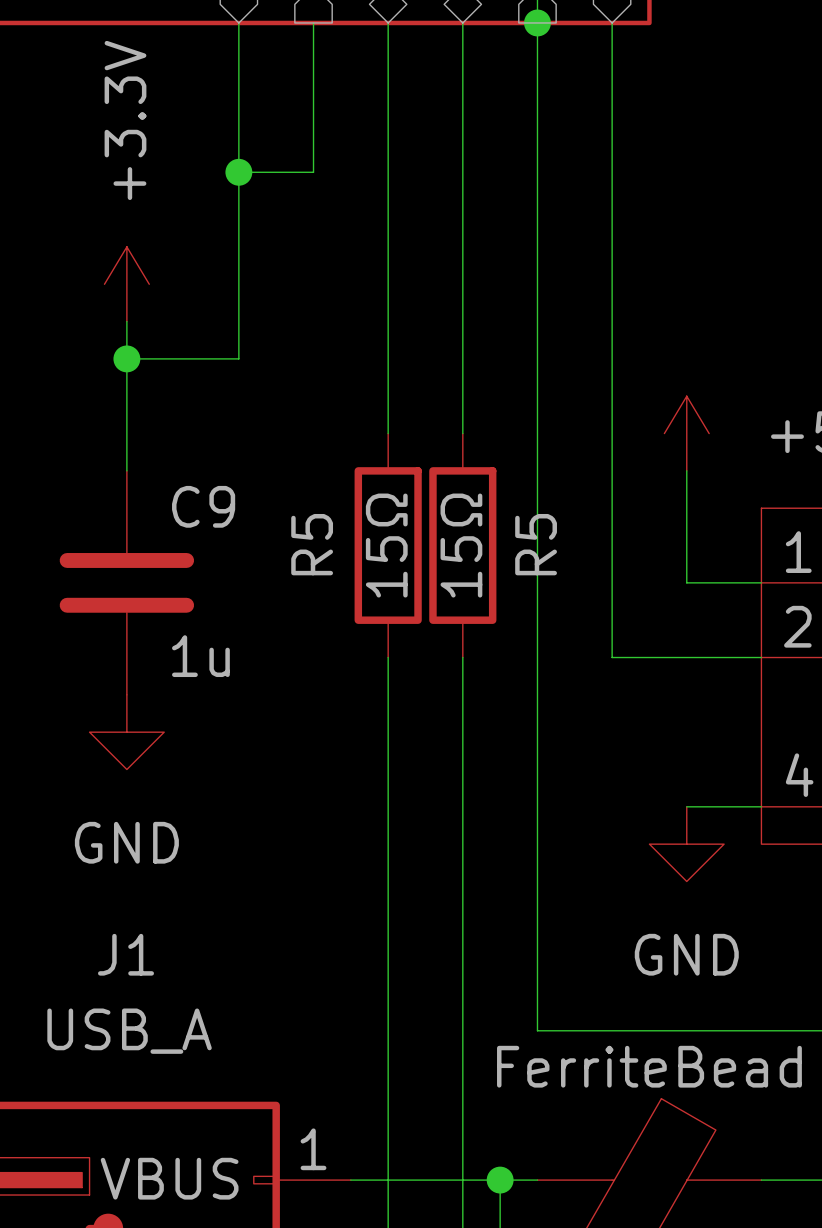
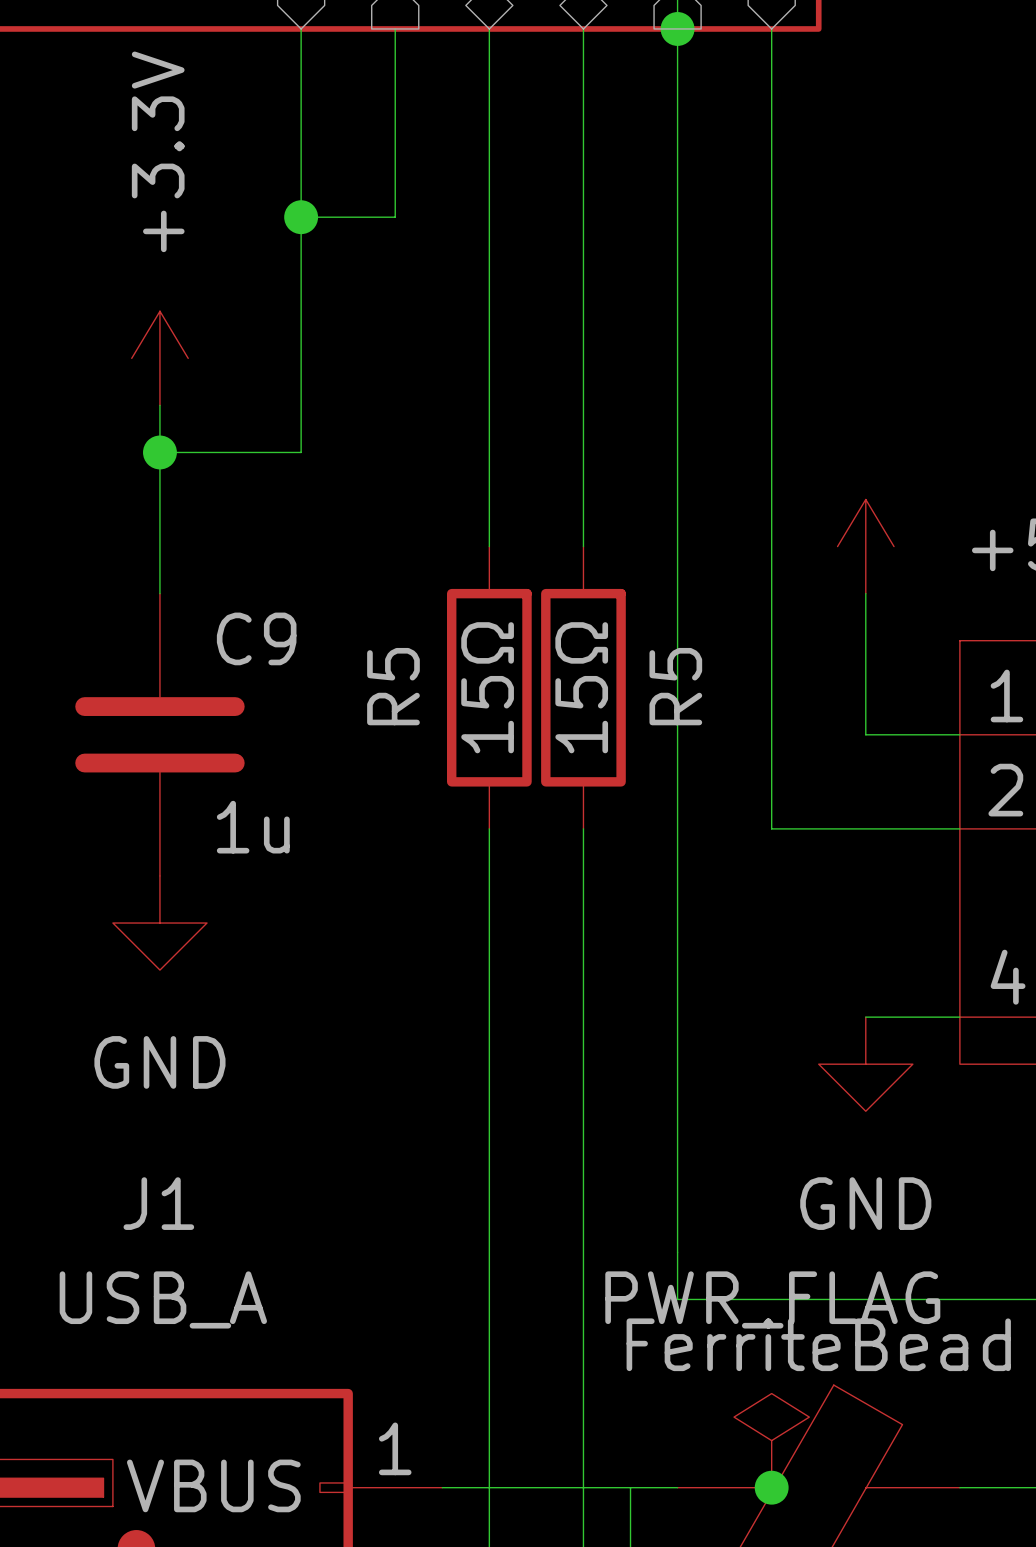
power symbol: none -> PWR_FLAG (771, 1440)
junction: (500, 1180) -> none
junction: none -> (771, 1487)

